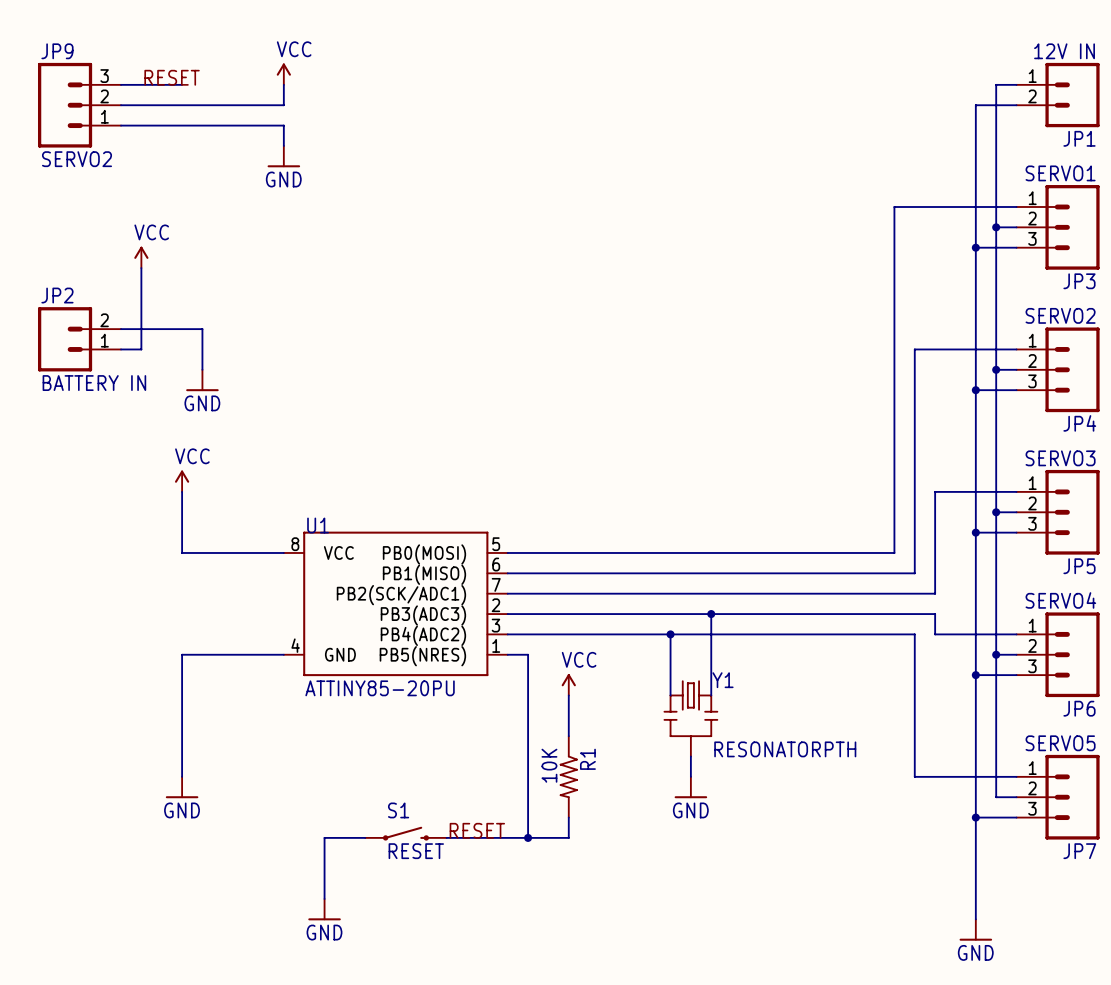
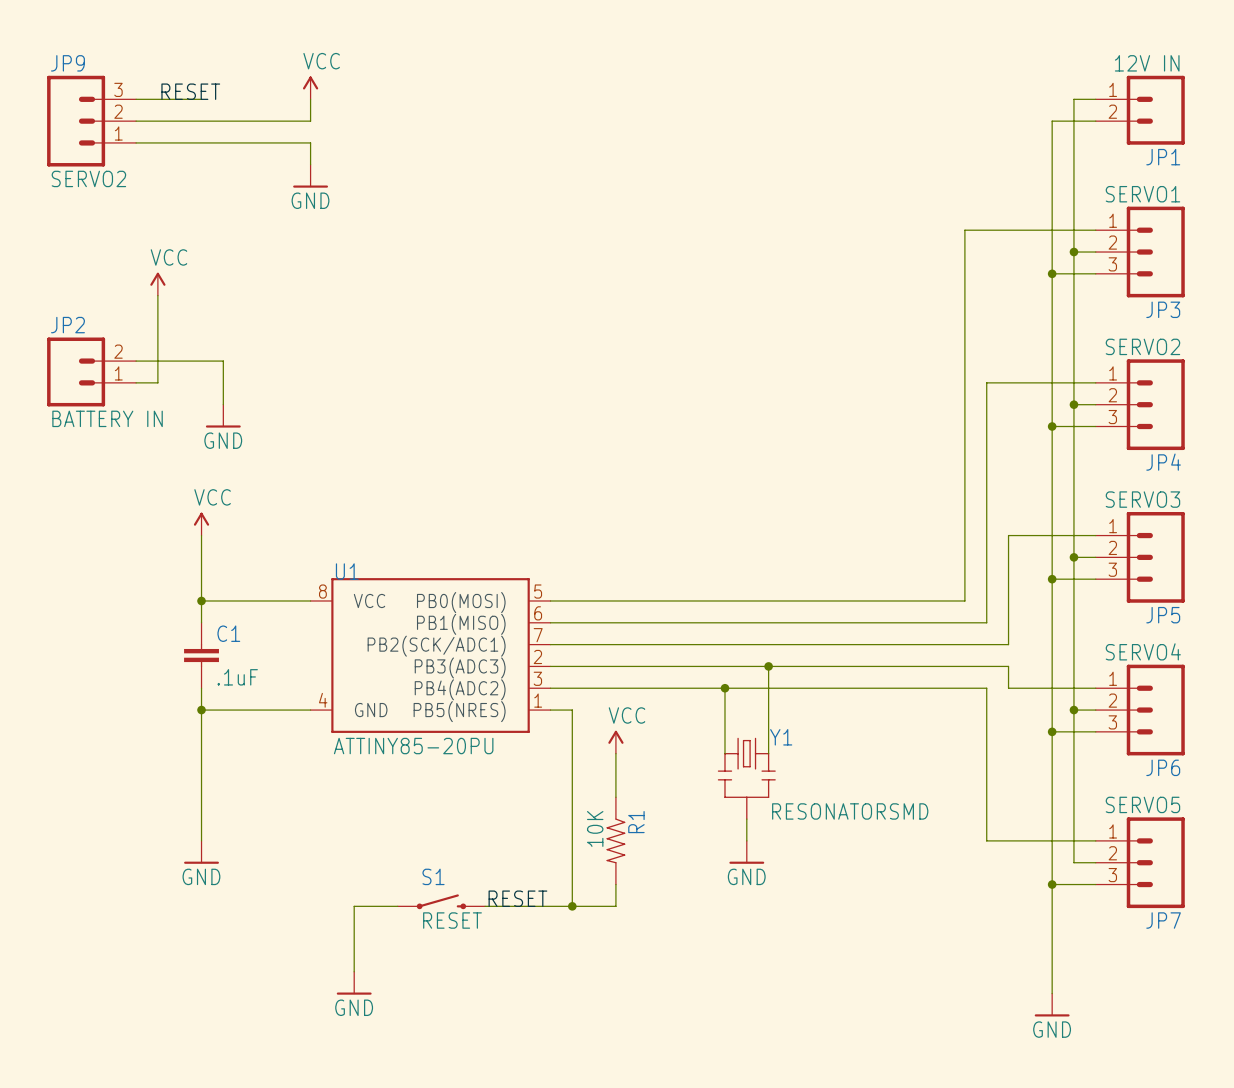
wire: none -> (201, 600) (201, 622)
junction: none -> (201, 600)
C1: none -> .1uF (201, 655)
wire: none -> (201, 688) (201, 710)
junction: none -> (201, 710)
Y1 value: RESONATORPTH (785, 749) -> RESONATORSMD (850, 811)

